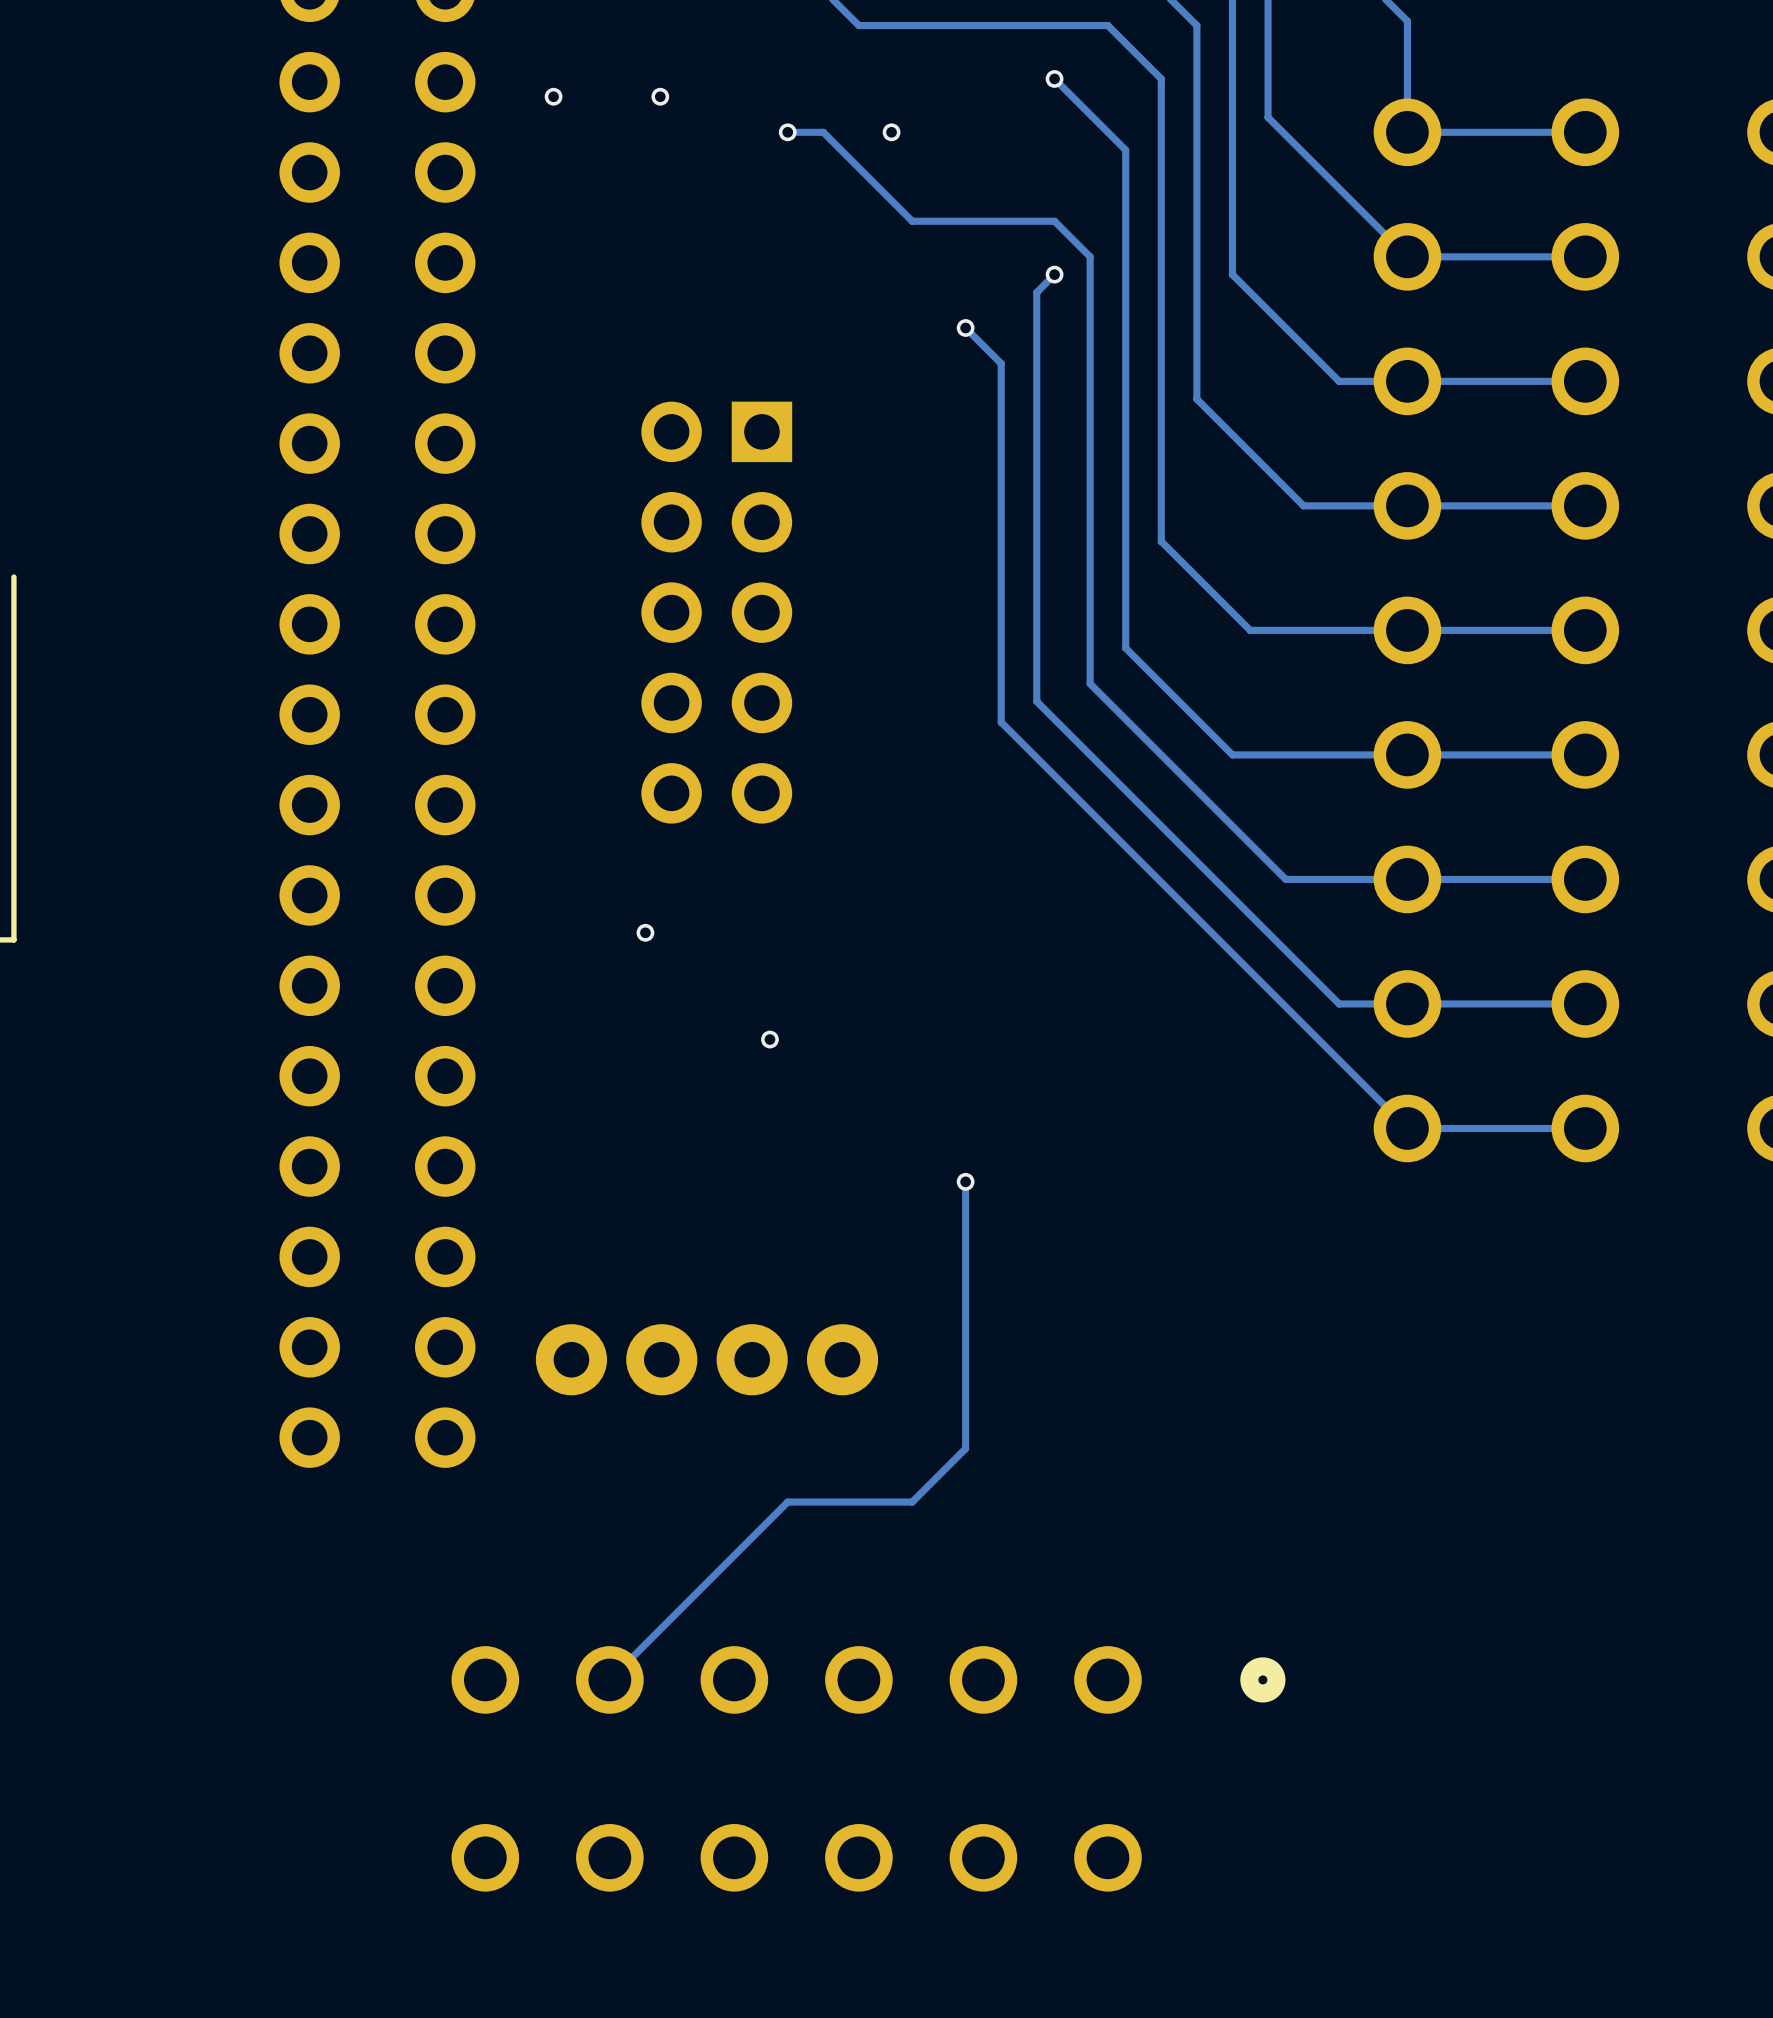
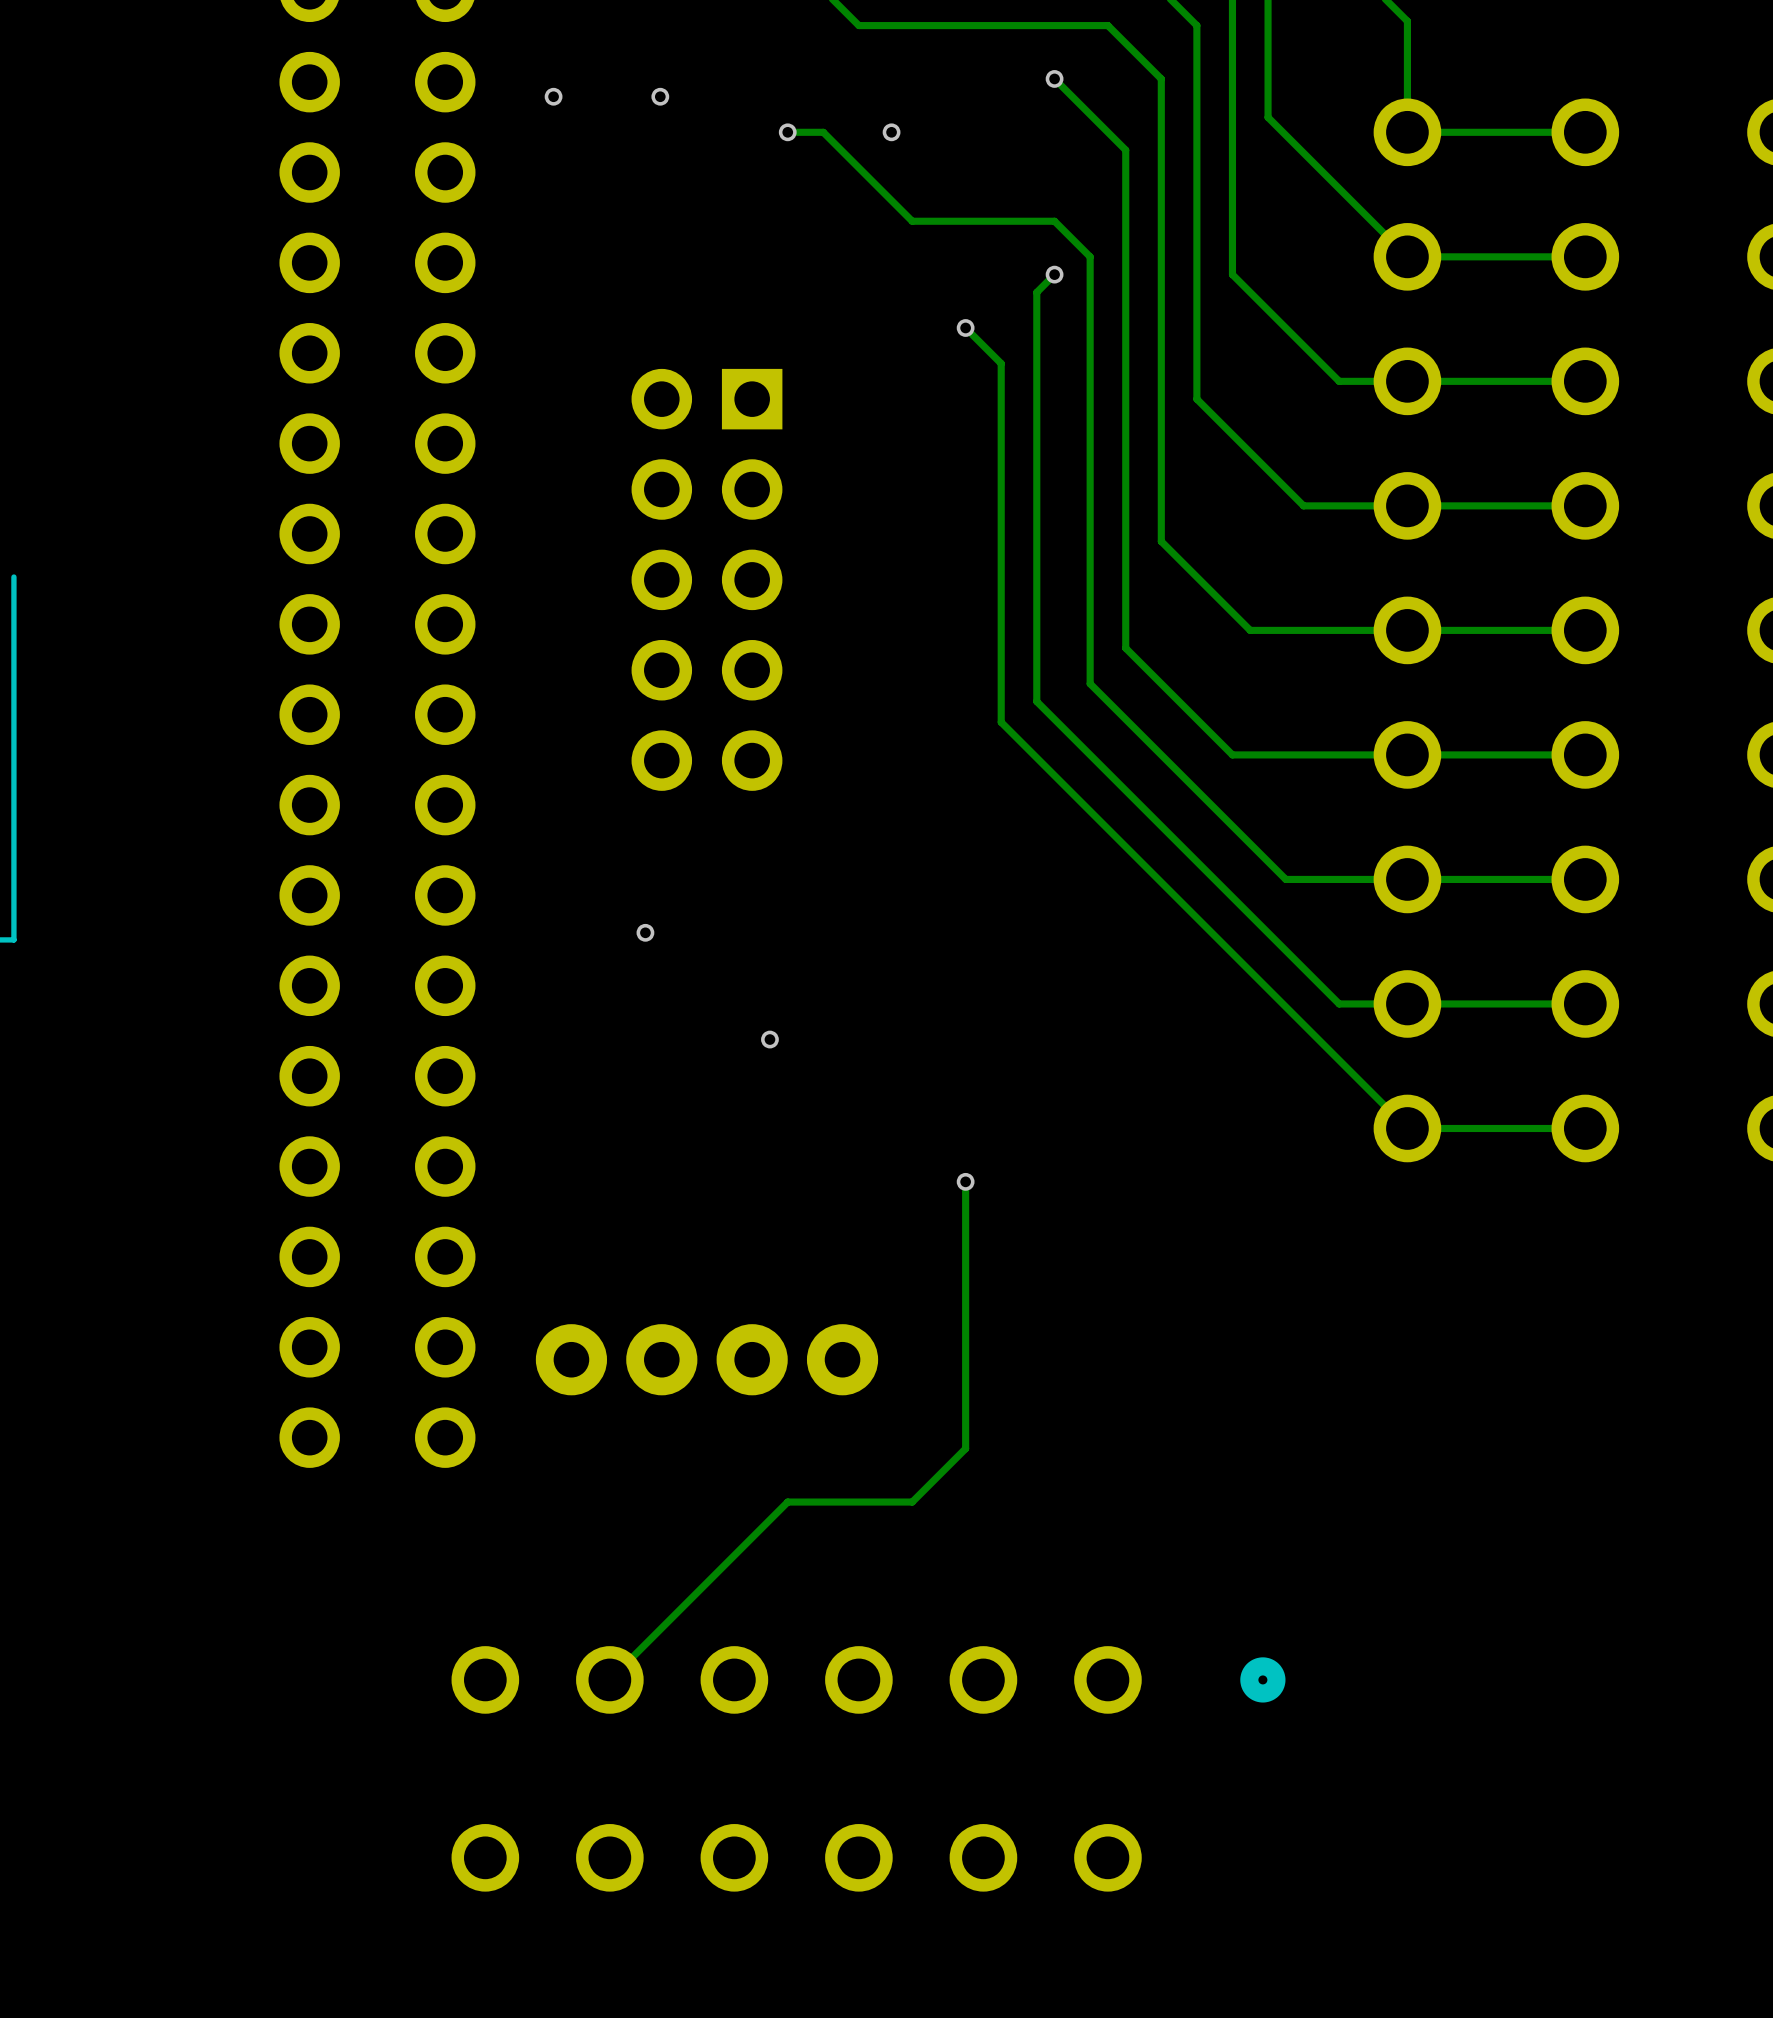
part position: (716, 612) -> (706, 579)

